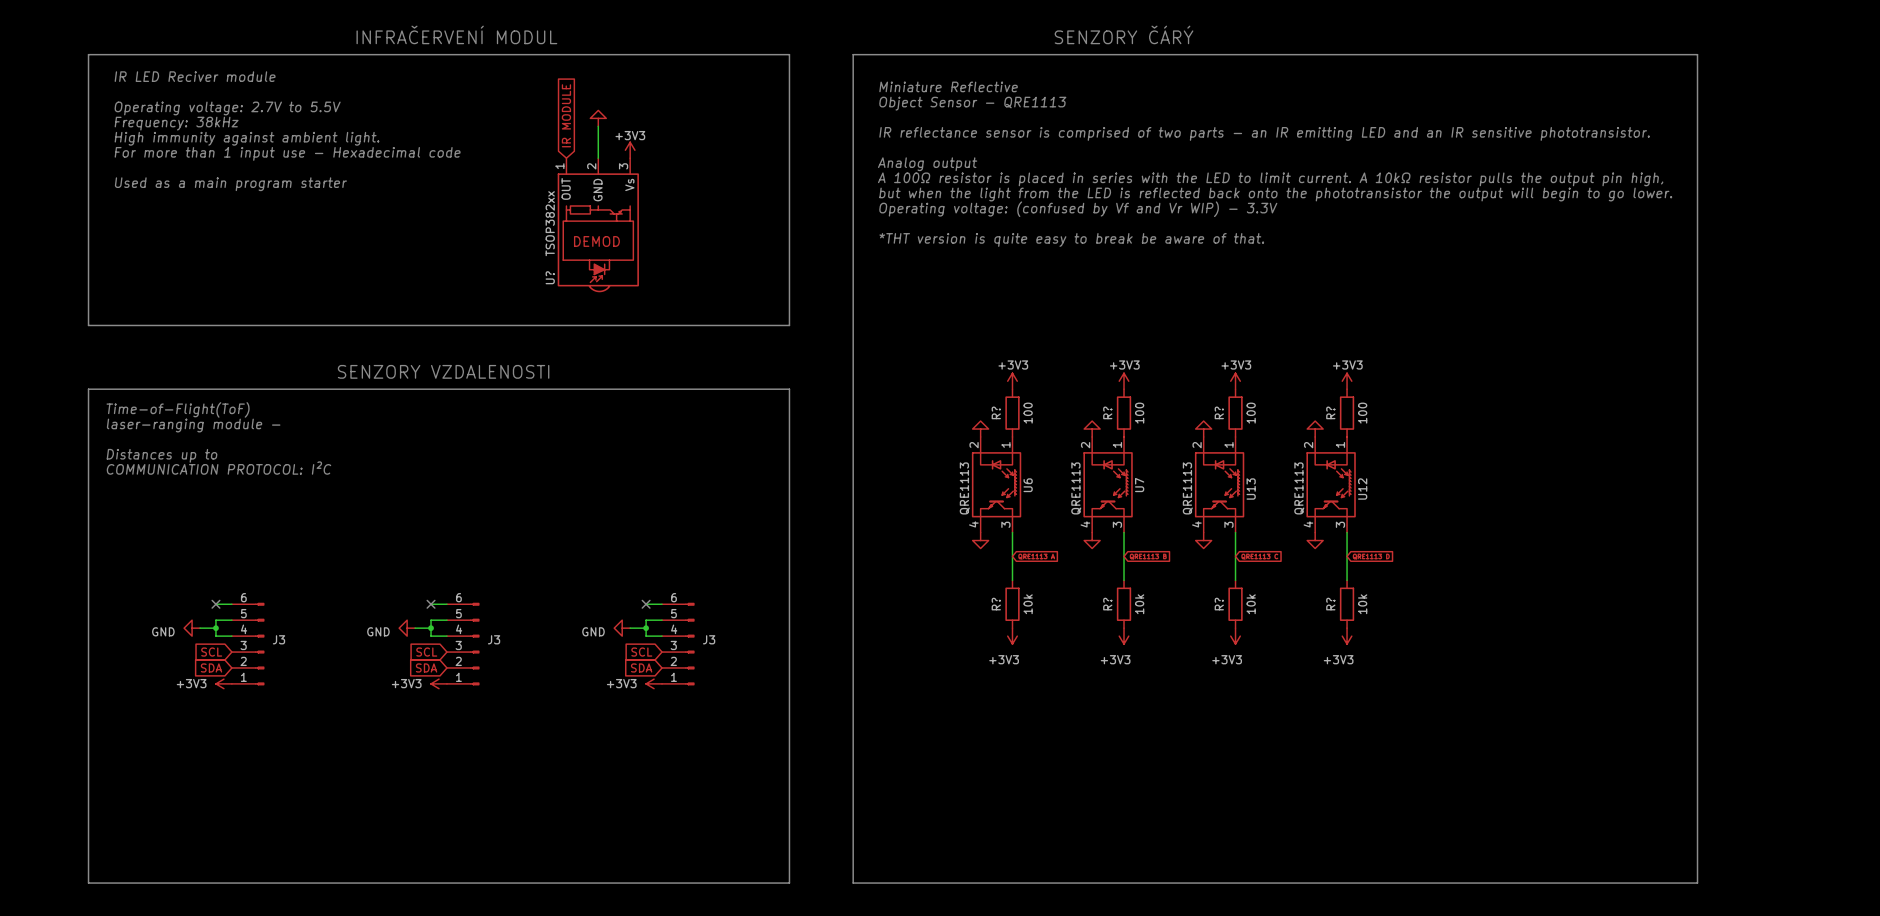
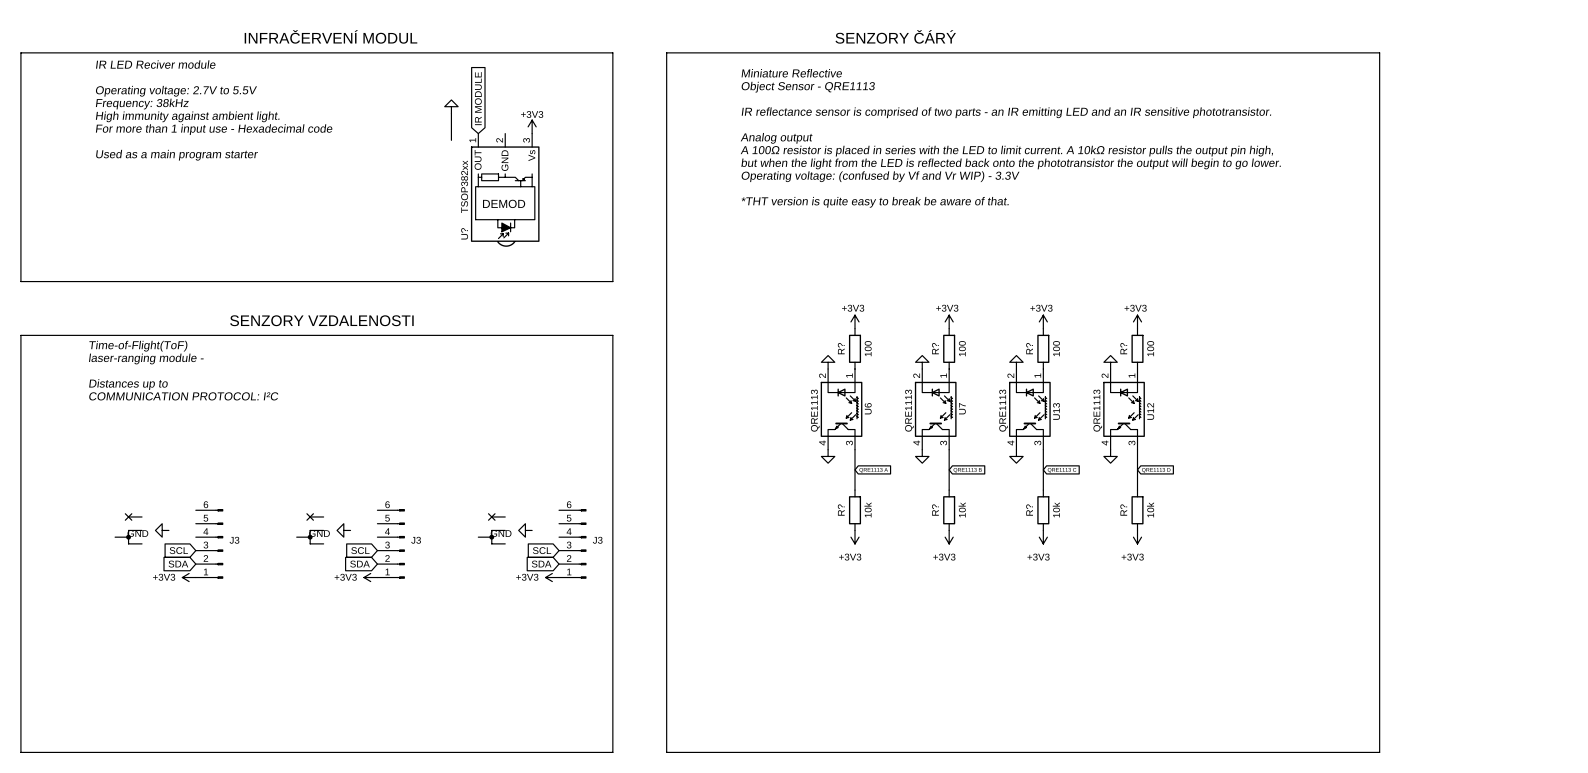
text position: INFRAČERVENÍ MODUL (456, 34) -> INFRAČERVENÍ MODUL (330, 36)
text position: SENZORY ČÁRÝ (1124, 34) -> SENZORY ČÁRÝ (895, 36)
line: (853, 54) (1697, 54) (1697, 883) (853, 883) (853, 54) -> none
line: none -> (20, 52) (612, 52) (612, 281) (20, 281) (20, 52)
line: (789, 62) (789, 54) (88, 54) (88, 325) (789, 325) -> (666, 328) (666, 274)
power symbol position: (598, 118) -> (451, 106)
wire: (598, 126) (598, 158) -> (451, 113) (451, 140)
text position: SENZORY VZDALENOSTI (443, 371) -> SENZORY VZDALENOSTI (321, 320)
line: (789, 389) (88, 389) (88, 883) (789, 883) -> (666, 52) (1379, 52) (1379, 752) (666, 752) (666, 745)
line: none -> (20, 335) (612, 335) (612, 752) (20, 752) (20, 335)
wire: (215, 604) (231, 604) -> (128, 516) (142, 516)
no-connect mark: (215, 604) -> none
wire: (431, 604) (446, 604) -> (310, 516) (323, 516)
no-connect mark: (431, 604) -> none
wire: (646, 604) (662, 604) -> (491, 516) (505, 516)
no-connect mark: (646, 604) -> none
no-connect mark: none -> (128, 516)
no-connect mark: none -> (310, 516)
no-connect mark: none -> (491, 516)
wire: (231, 620) (215, 620) (215, 636) (231, 636) -> (142, 530) (128, 530) (128, 543) (142, 543)
wire: (446, 620) (431, 620) (431, 636) (446, 636) -> (323, 530) (310, 530) (310, 543) (323, 543)
wire: (662, 620) (646, 620) (646, 636) (662, 636) -> (505, 530) (491, 530) (491, 543) (505, 543)
wire: (200, 628) (215, 628) -> (115, 537) (128, 537)
junction: (215, 628) -> none
wire: (415, 628) (431, 628) -> (296, 537) (310, 537)
junction: (431, 628) -> none
wire: (630, 628) (646, 628) -> (478, 537) (491, 537)
junction: (646, 628) -> none
junction: none -> (128, 537)
junction: none -> (310, 537)
junction: none -> (491, 537)

